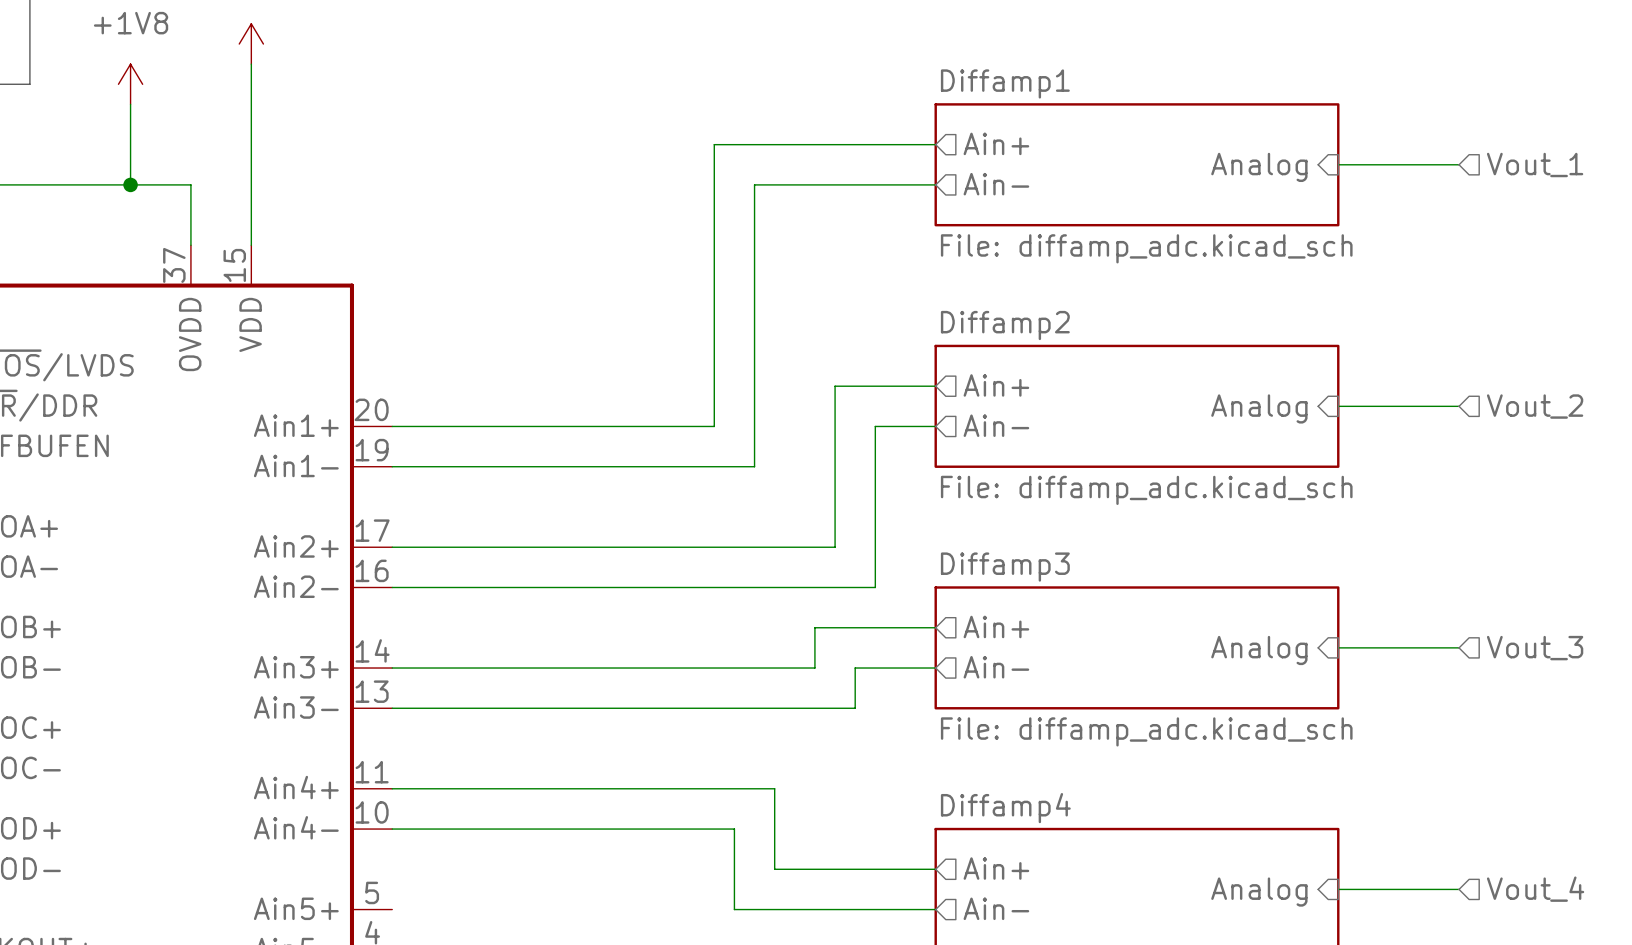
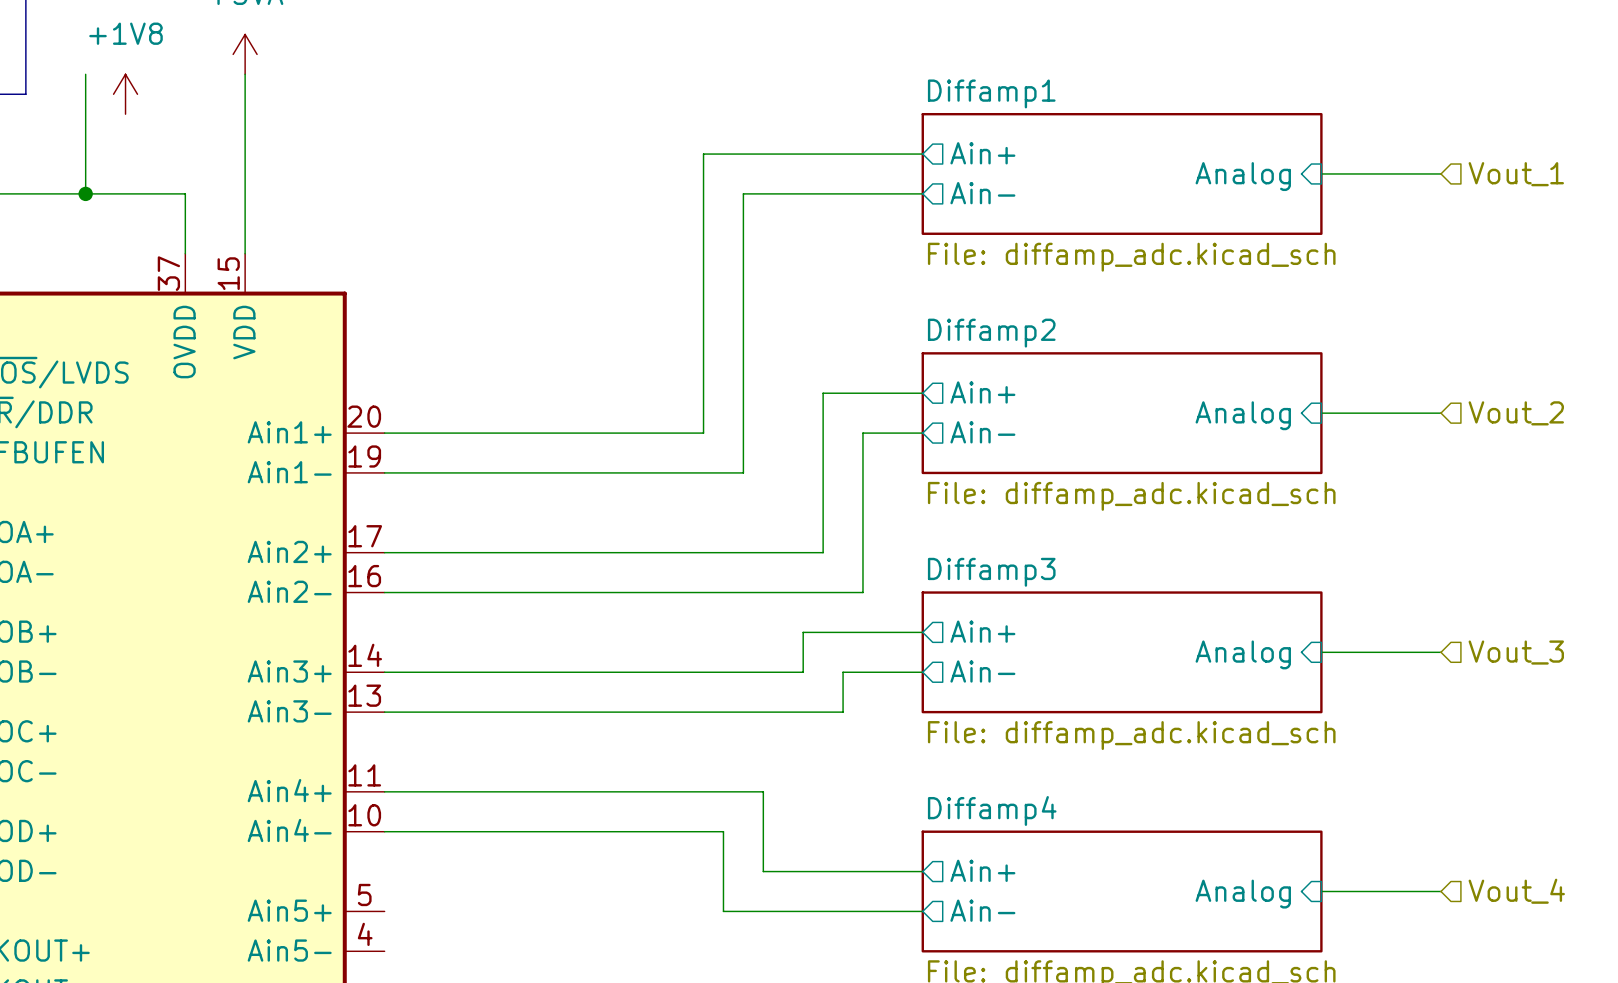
wire: none -> (85, 74) (85, 193)
wire: (130, 104) (130, 184) -> none
junction position: (130, 184) -> (85, 193)

